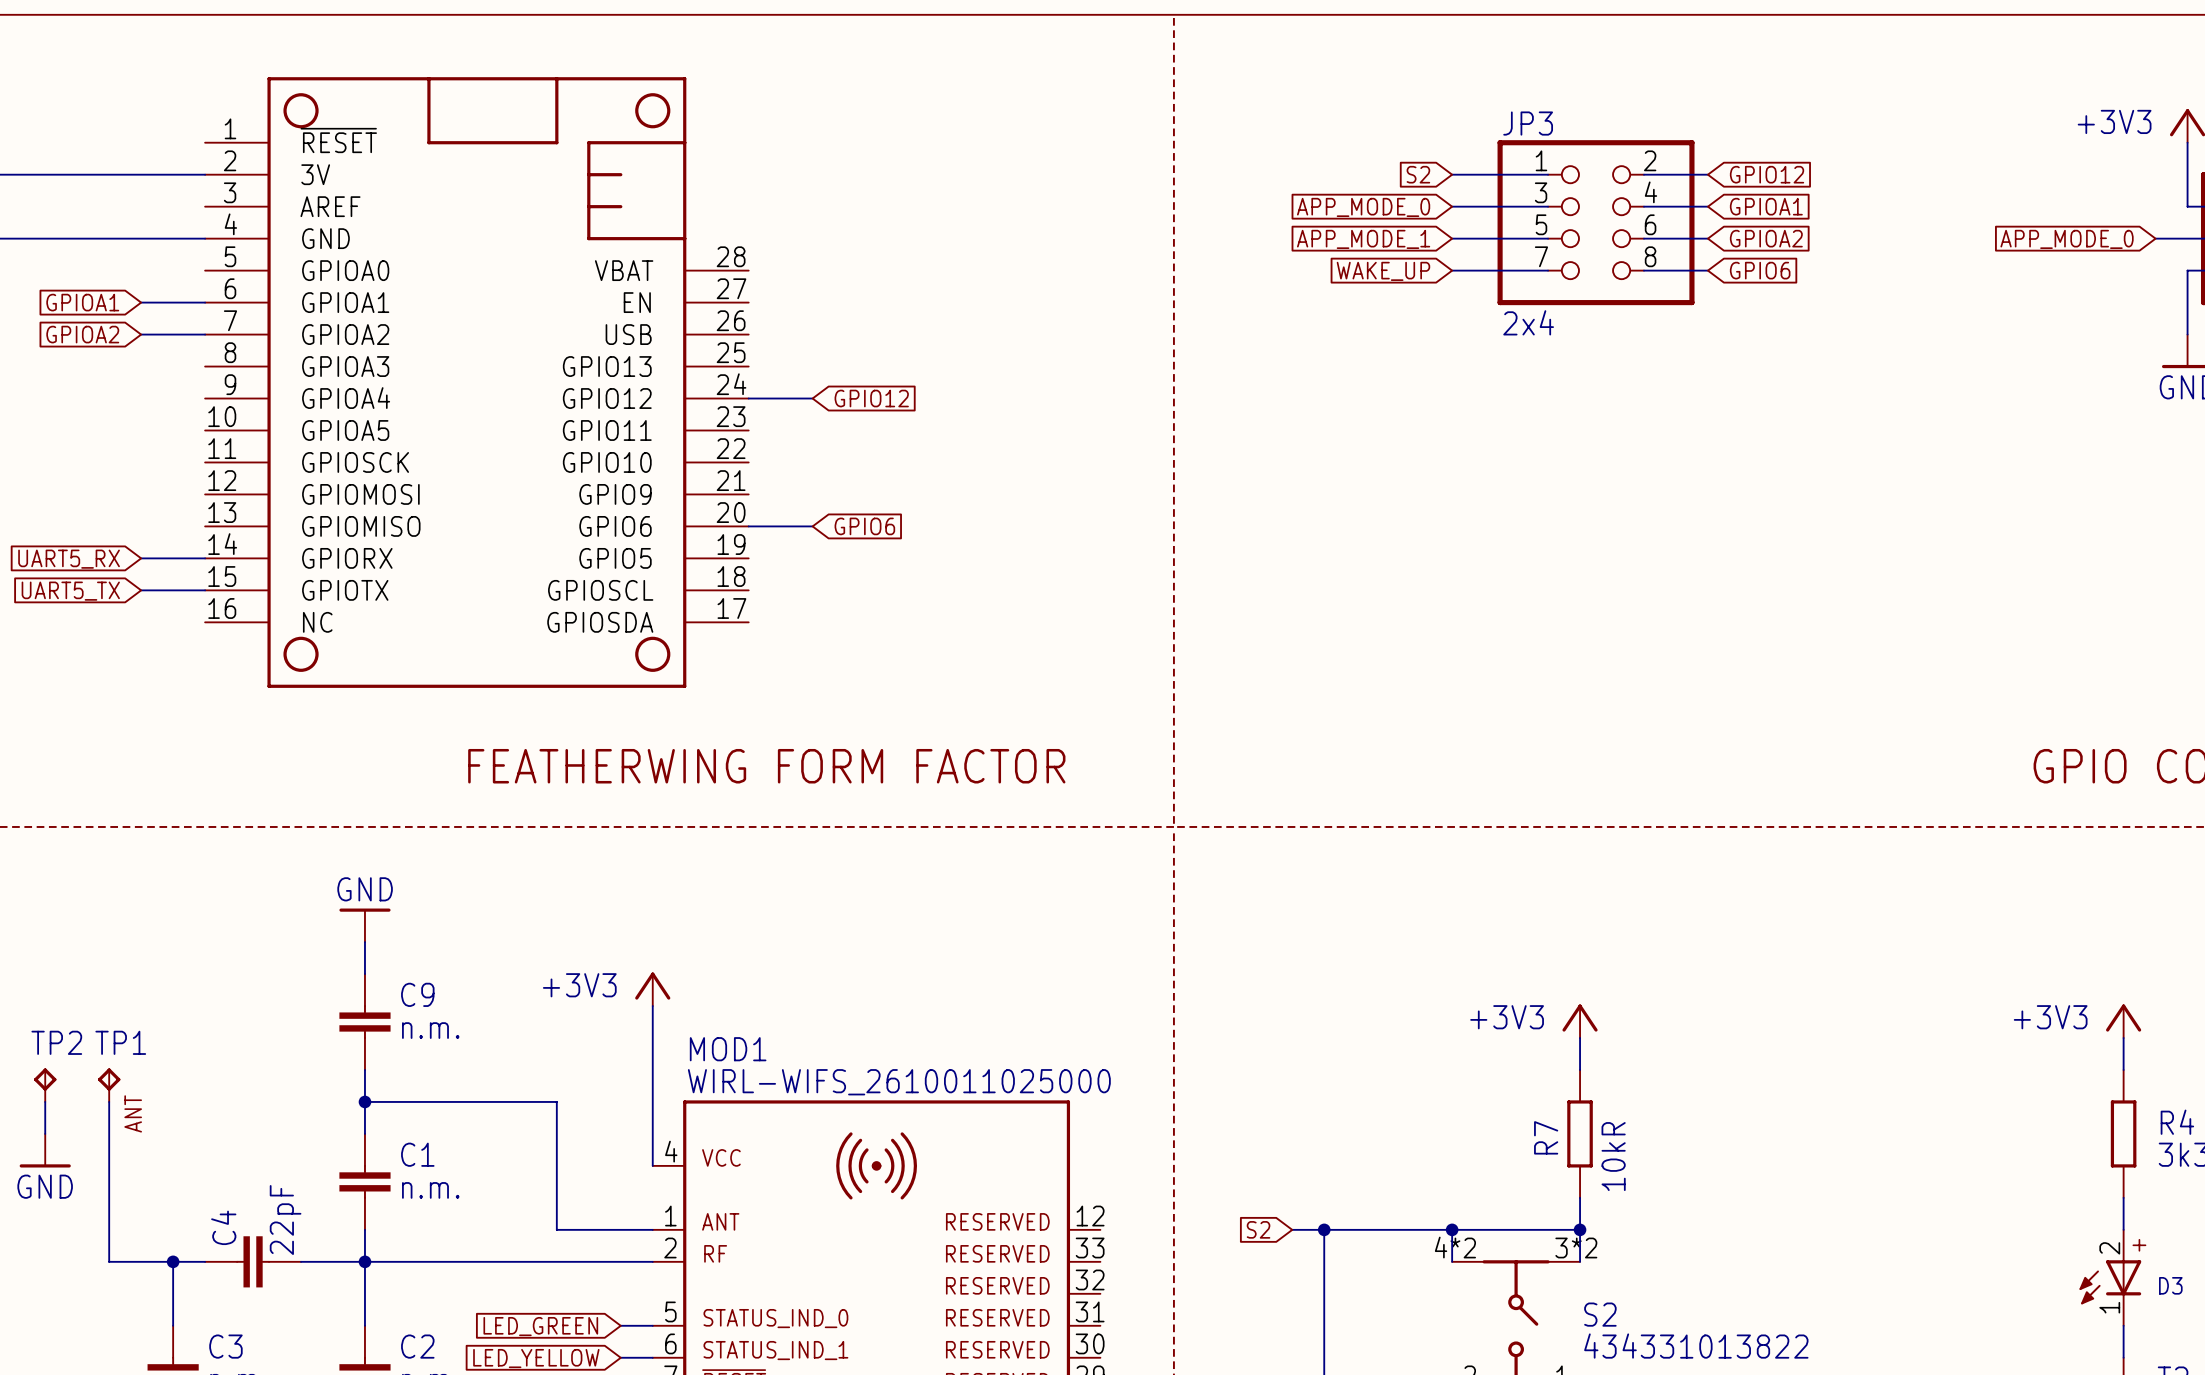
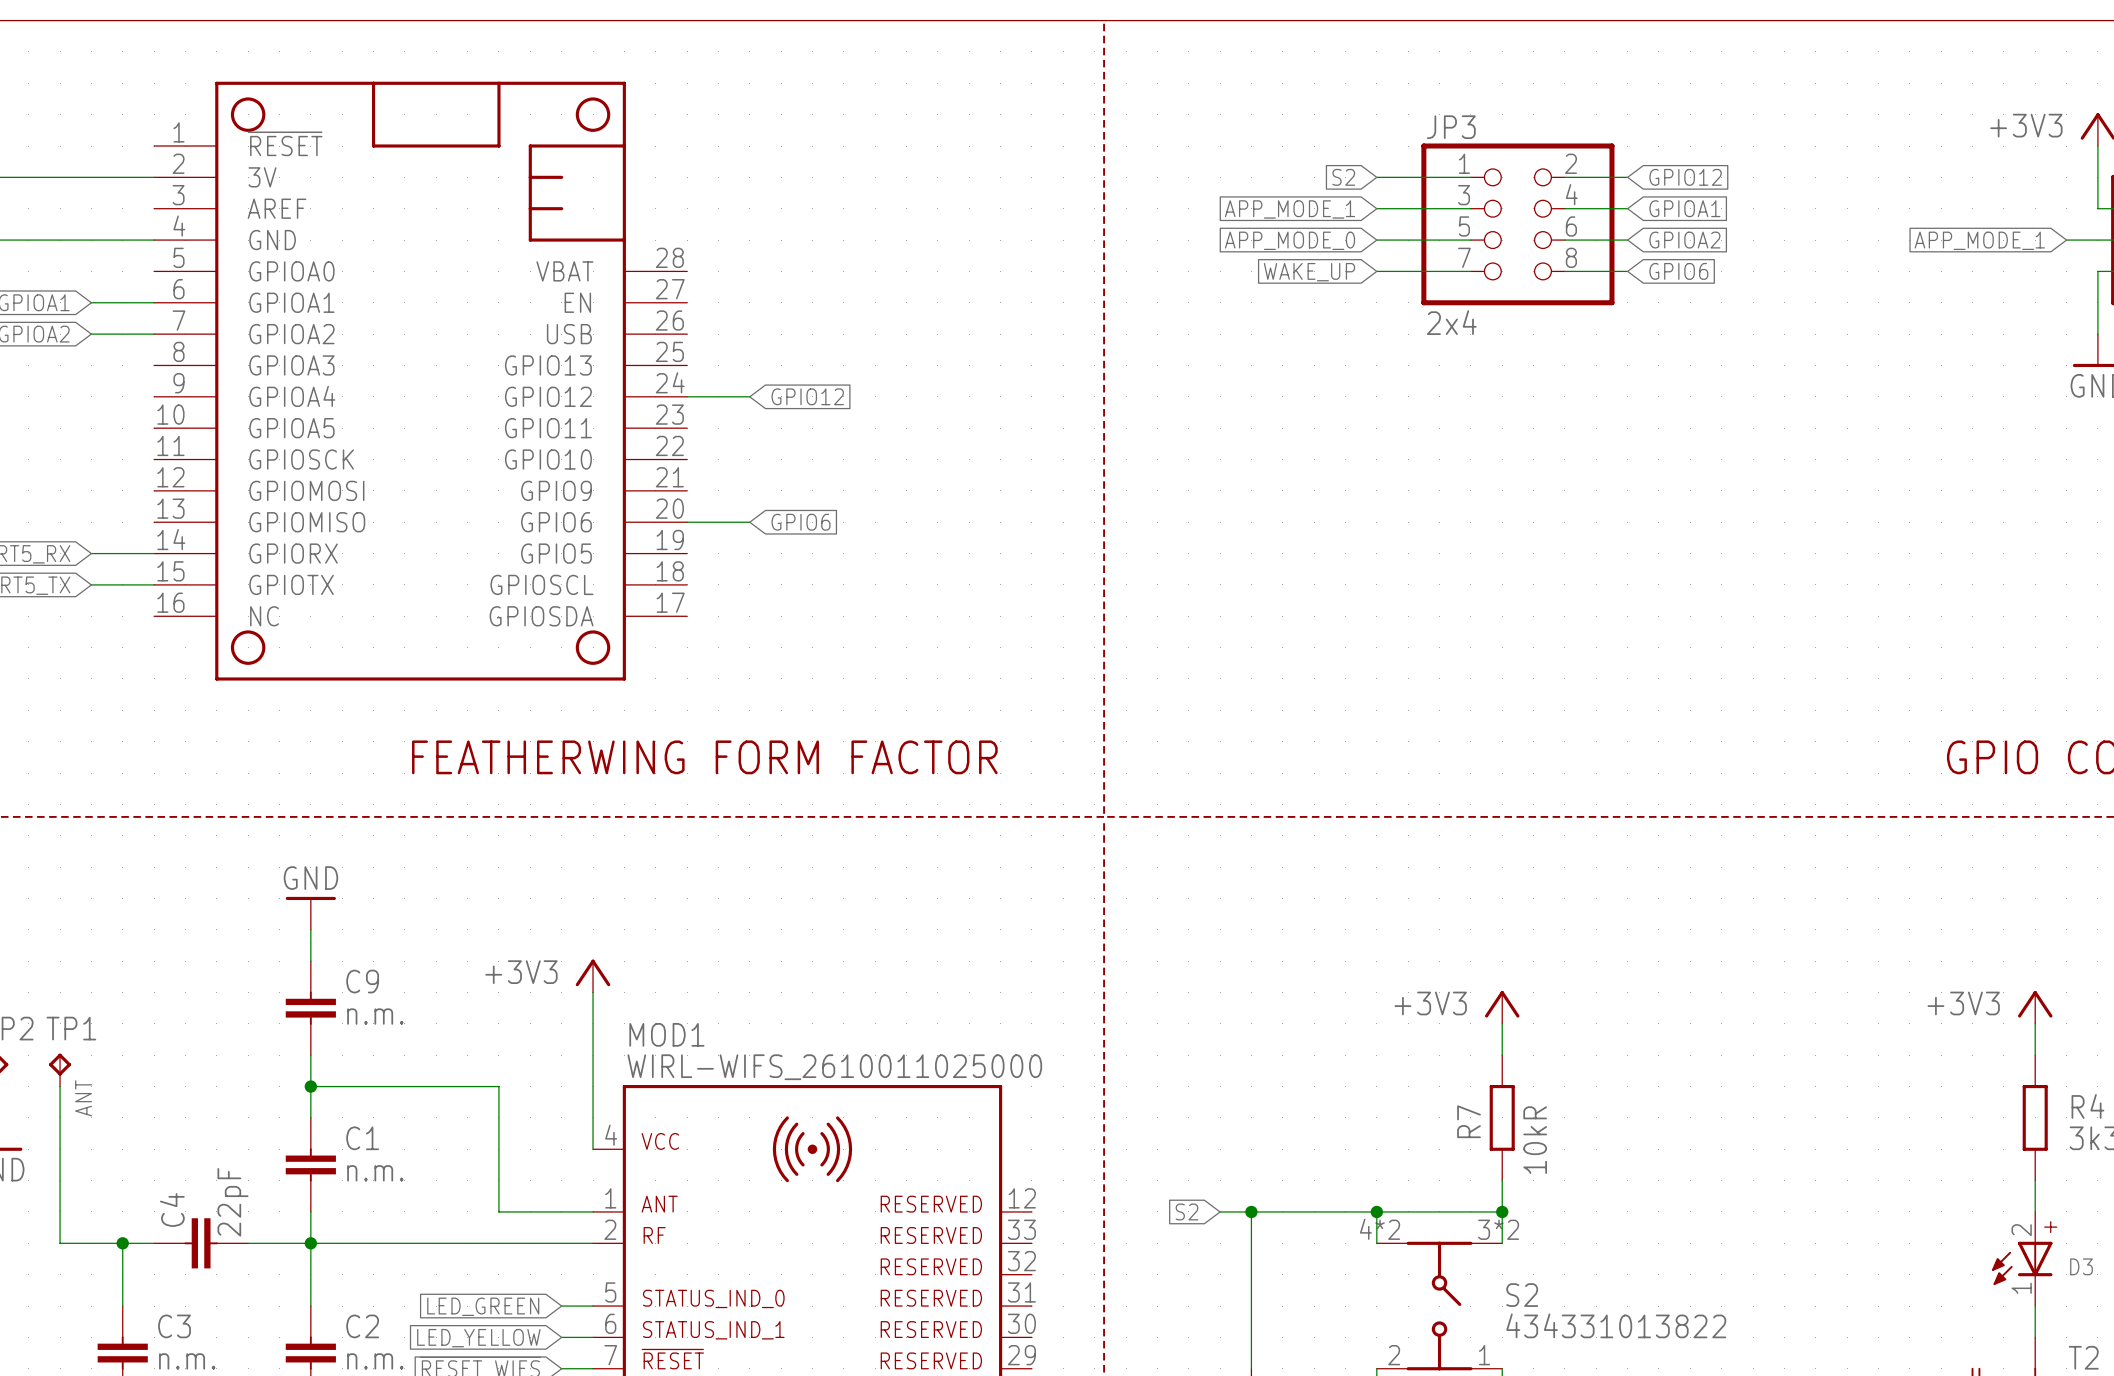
global label: APP_MODE_0 (1363, 207) -> APP_MODE_1 (1290, 209)
global label: APP_MODE_1 (1363, 239) -> APP_MODE_0 (1290, 240)
global label: APP_MODE_0 (2067, 239) -> APP_MODE_1 (1979, 240)

